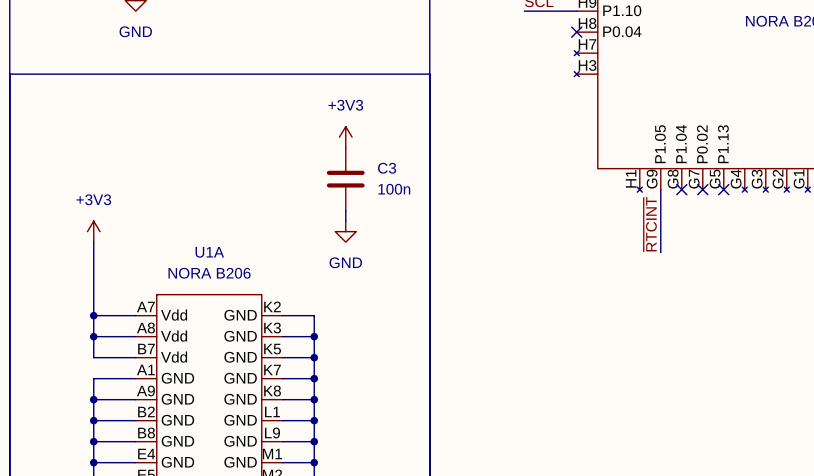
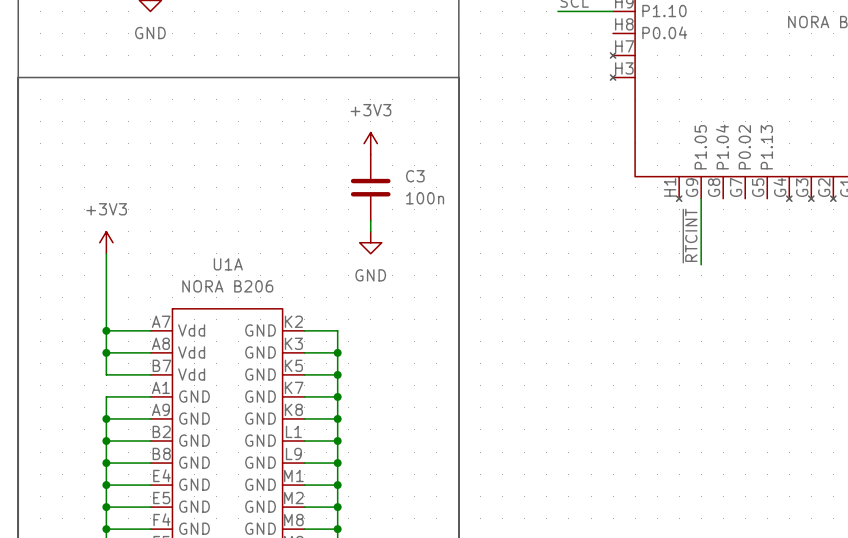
no-connect mark: (576, 32) -> none
no-connect mark: (681, 189) -> none
no-connect mark: (702, 189) -> none
no-connect mark: (723, 189) -> none

